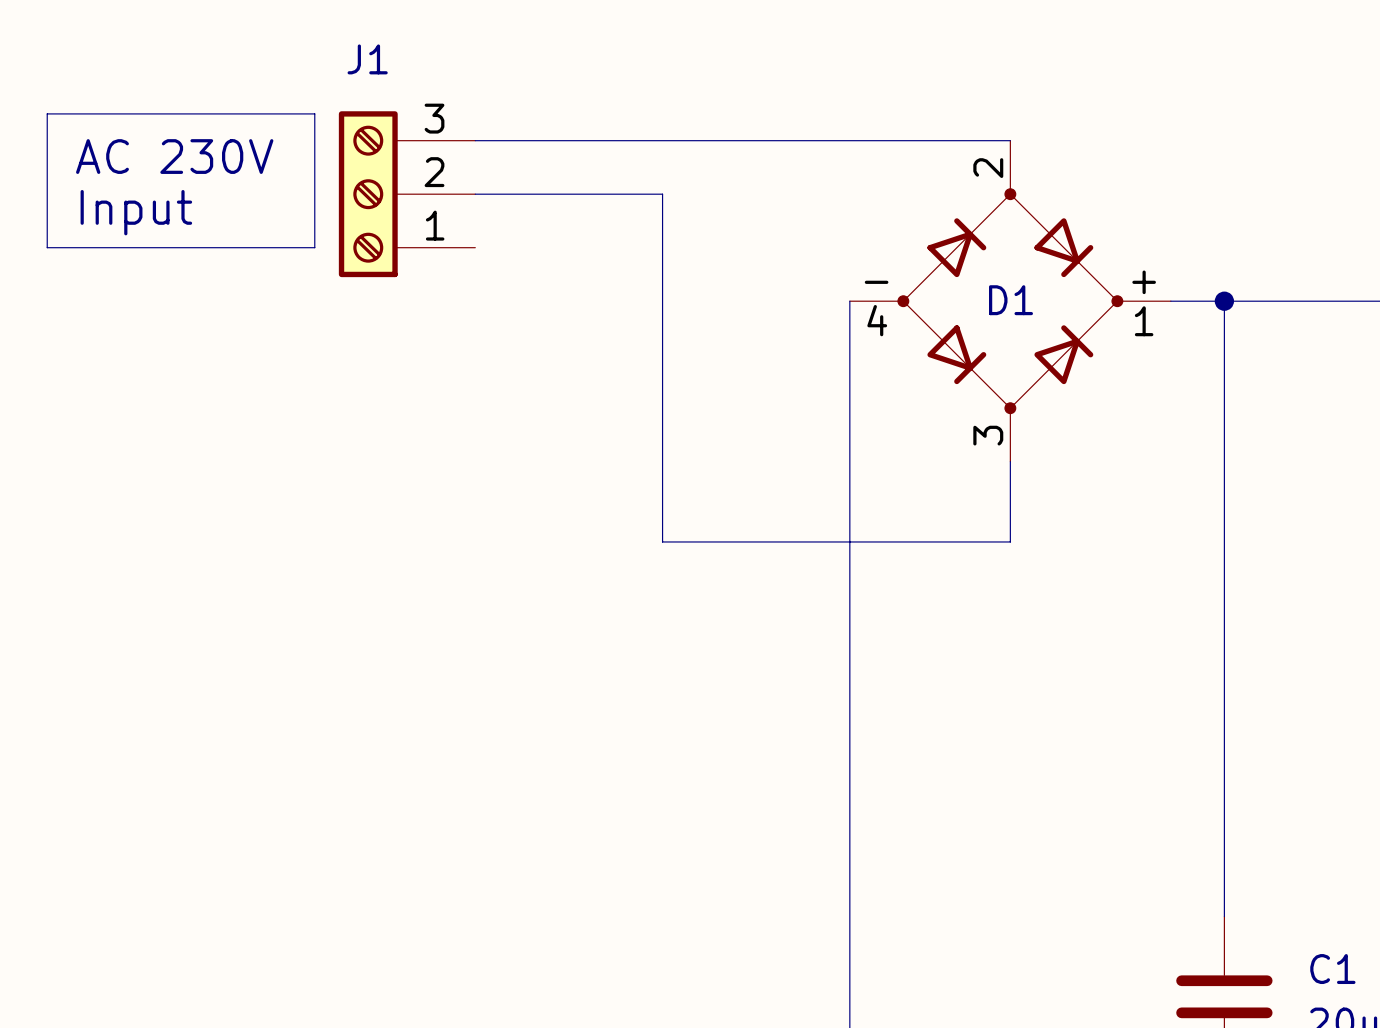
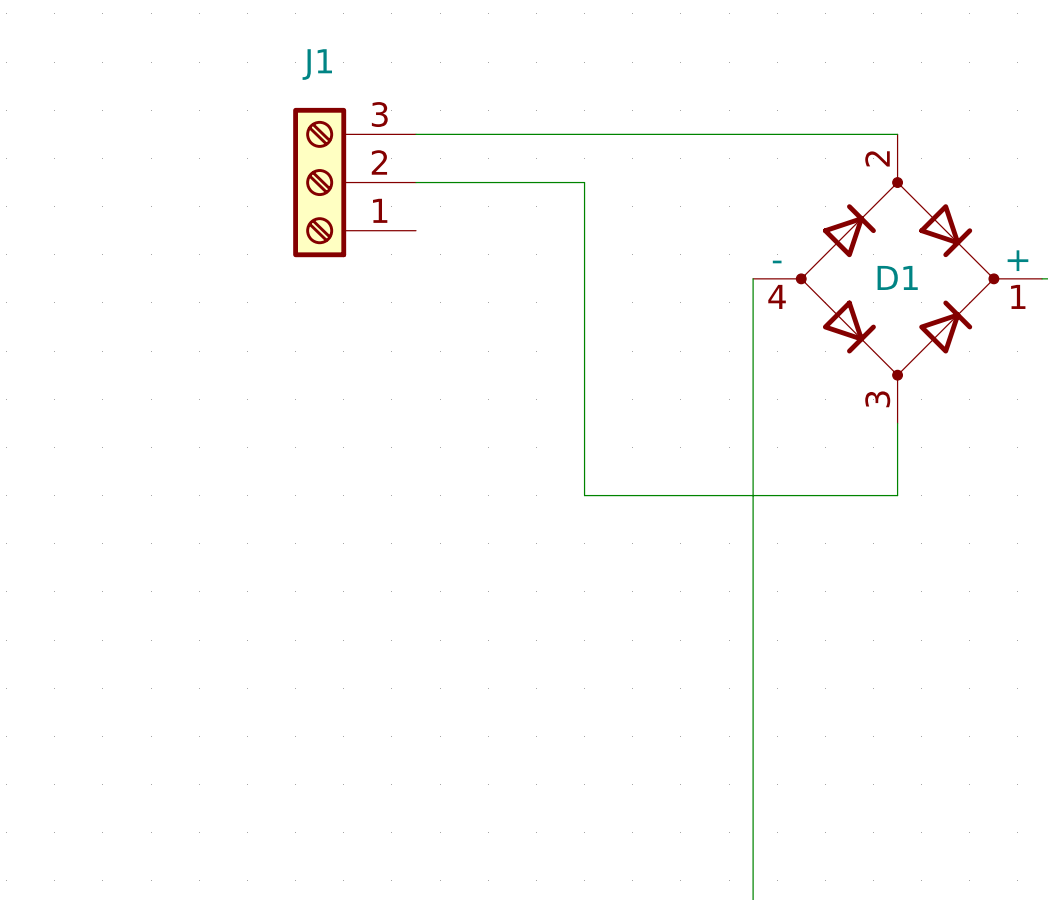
line: (47, 113) (314, 113) (314, 247) (47, 247) (47, 113) -> none
text: AC 230V (174, 156) -> none
text: Input (136, 212) -> none

